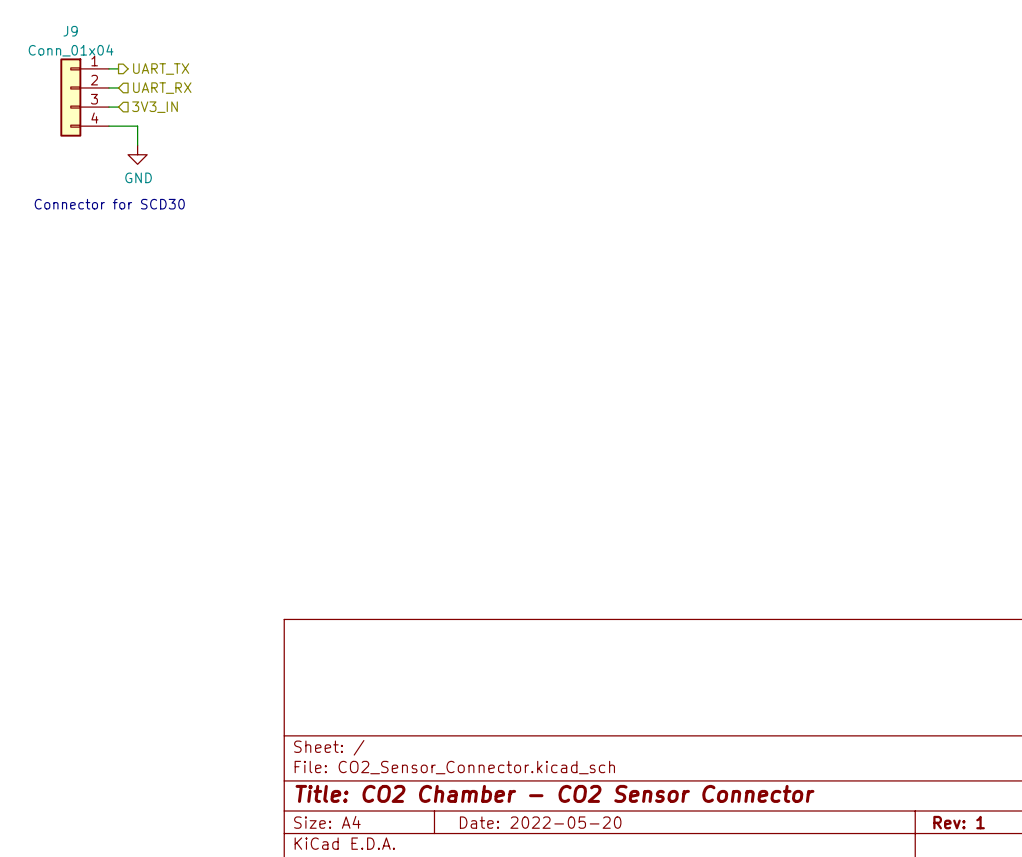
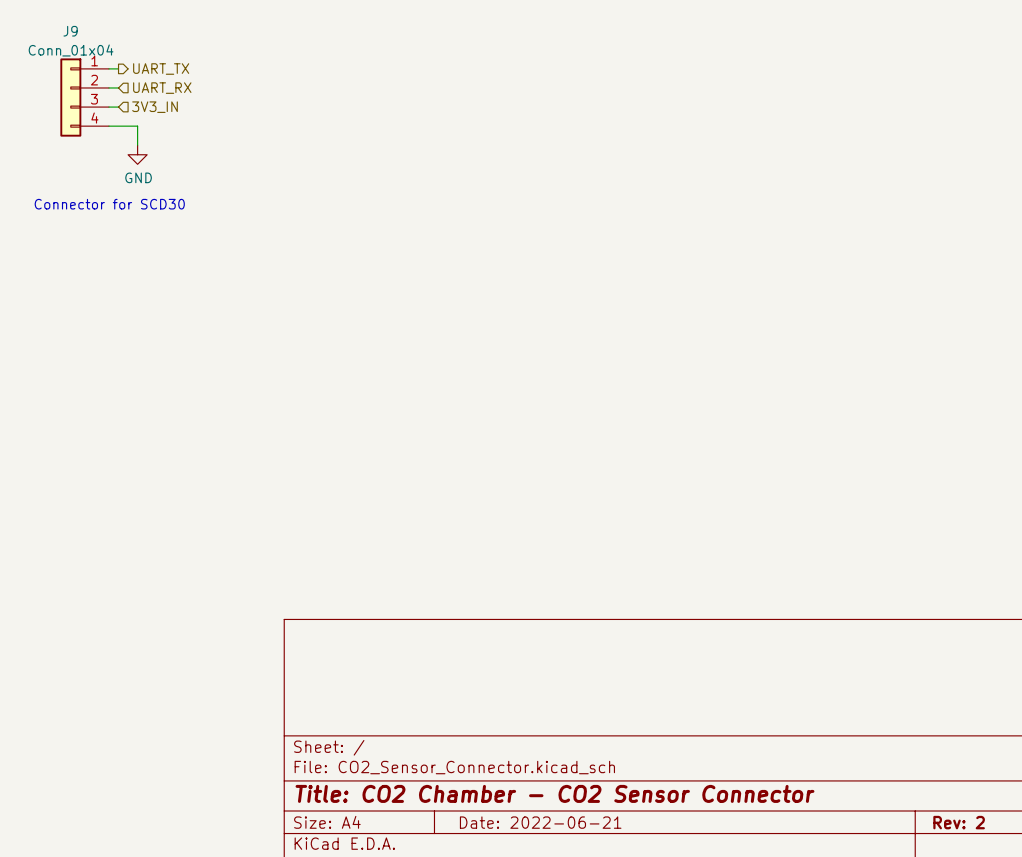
title block: Date: 2022-05-20 (540, 822) -> Date: 2022-06-21 (540, 822)
title block: Rev: 1 (959, 822) -> Rev: 2 (959, 822)

